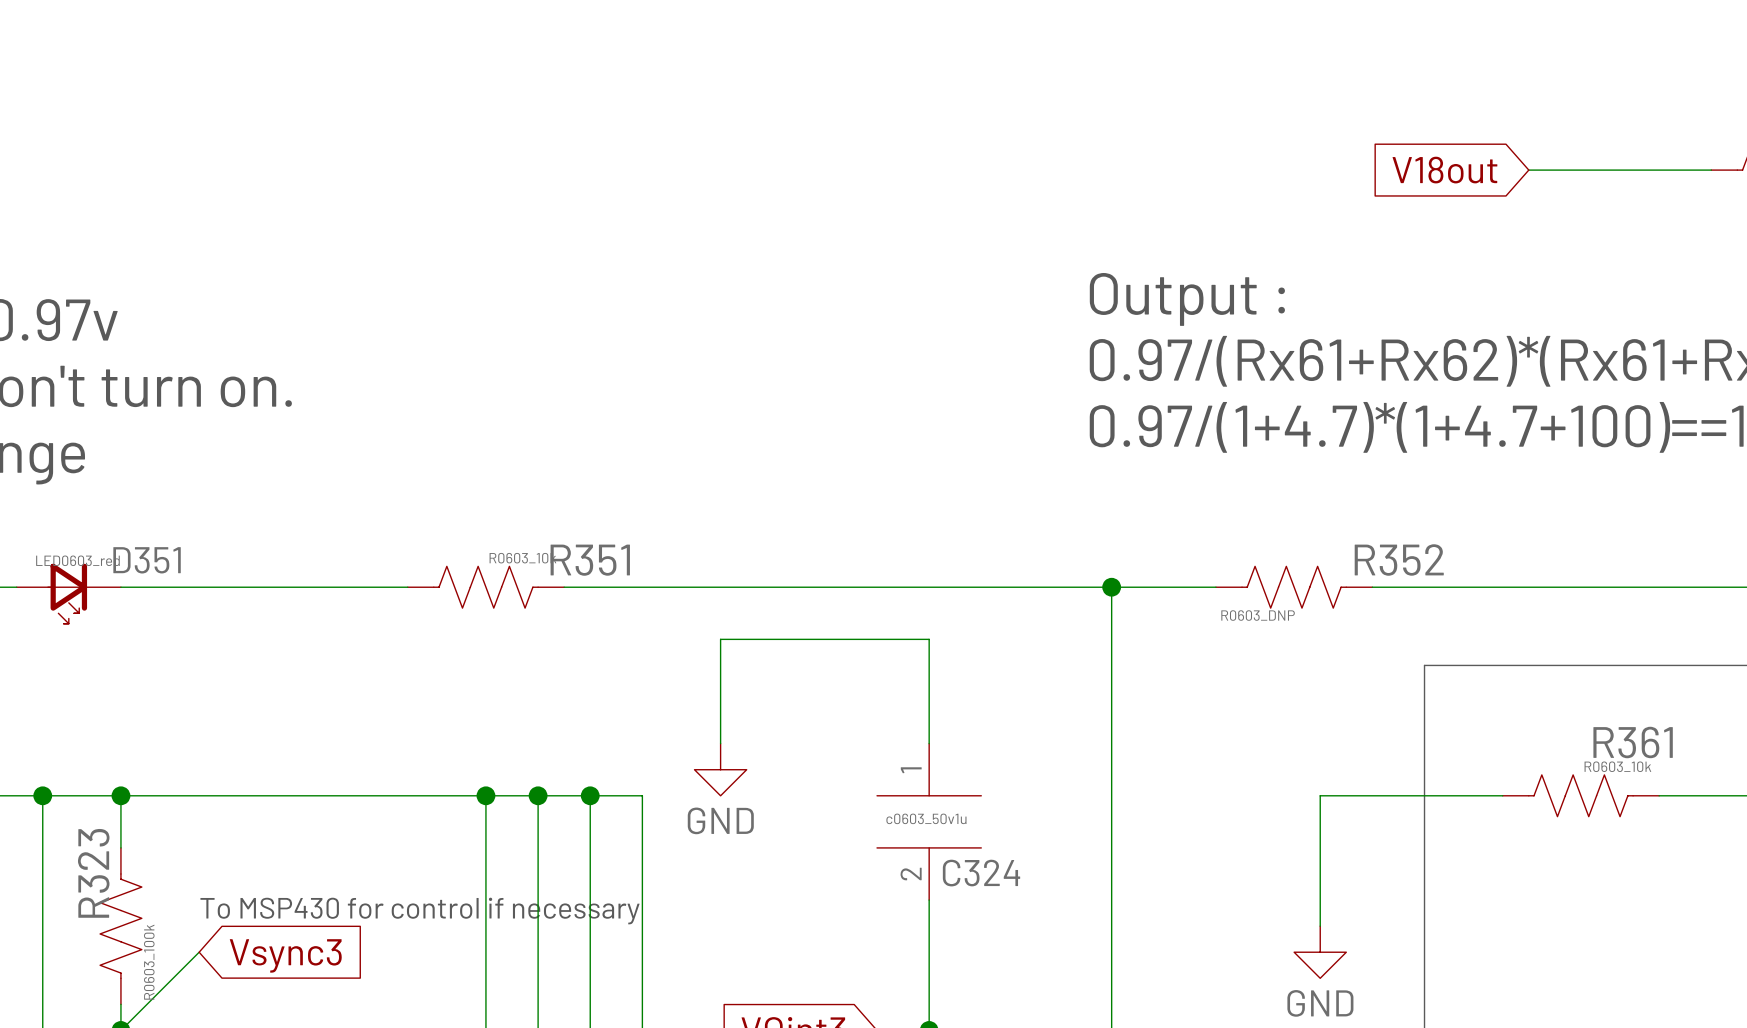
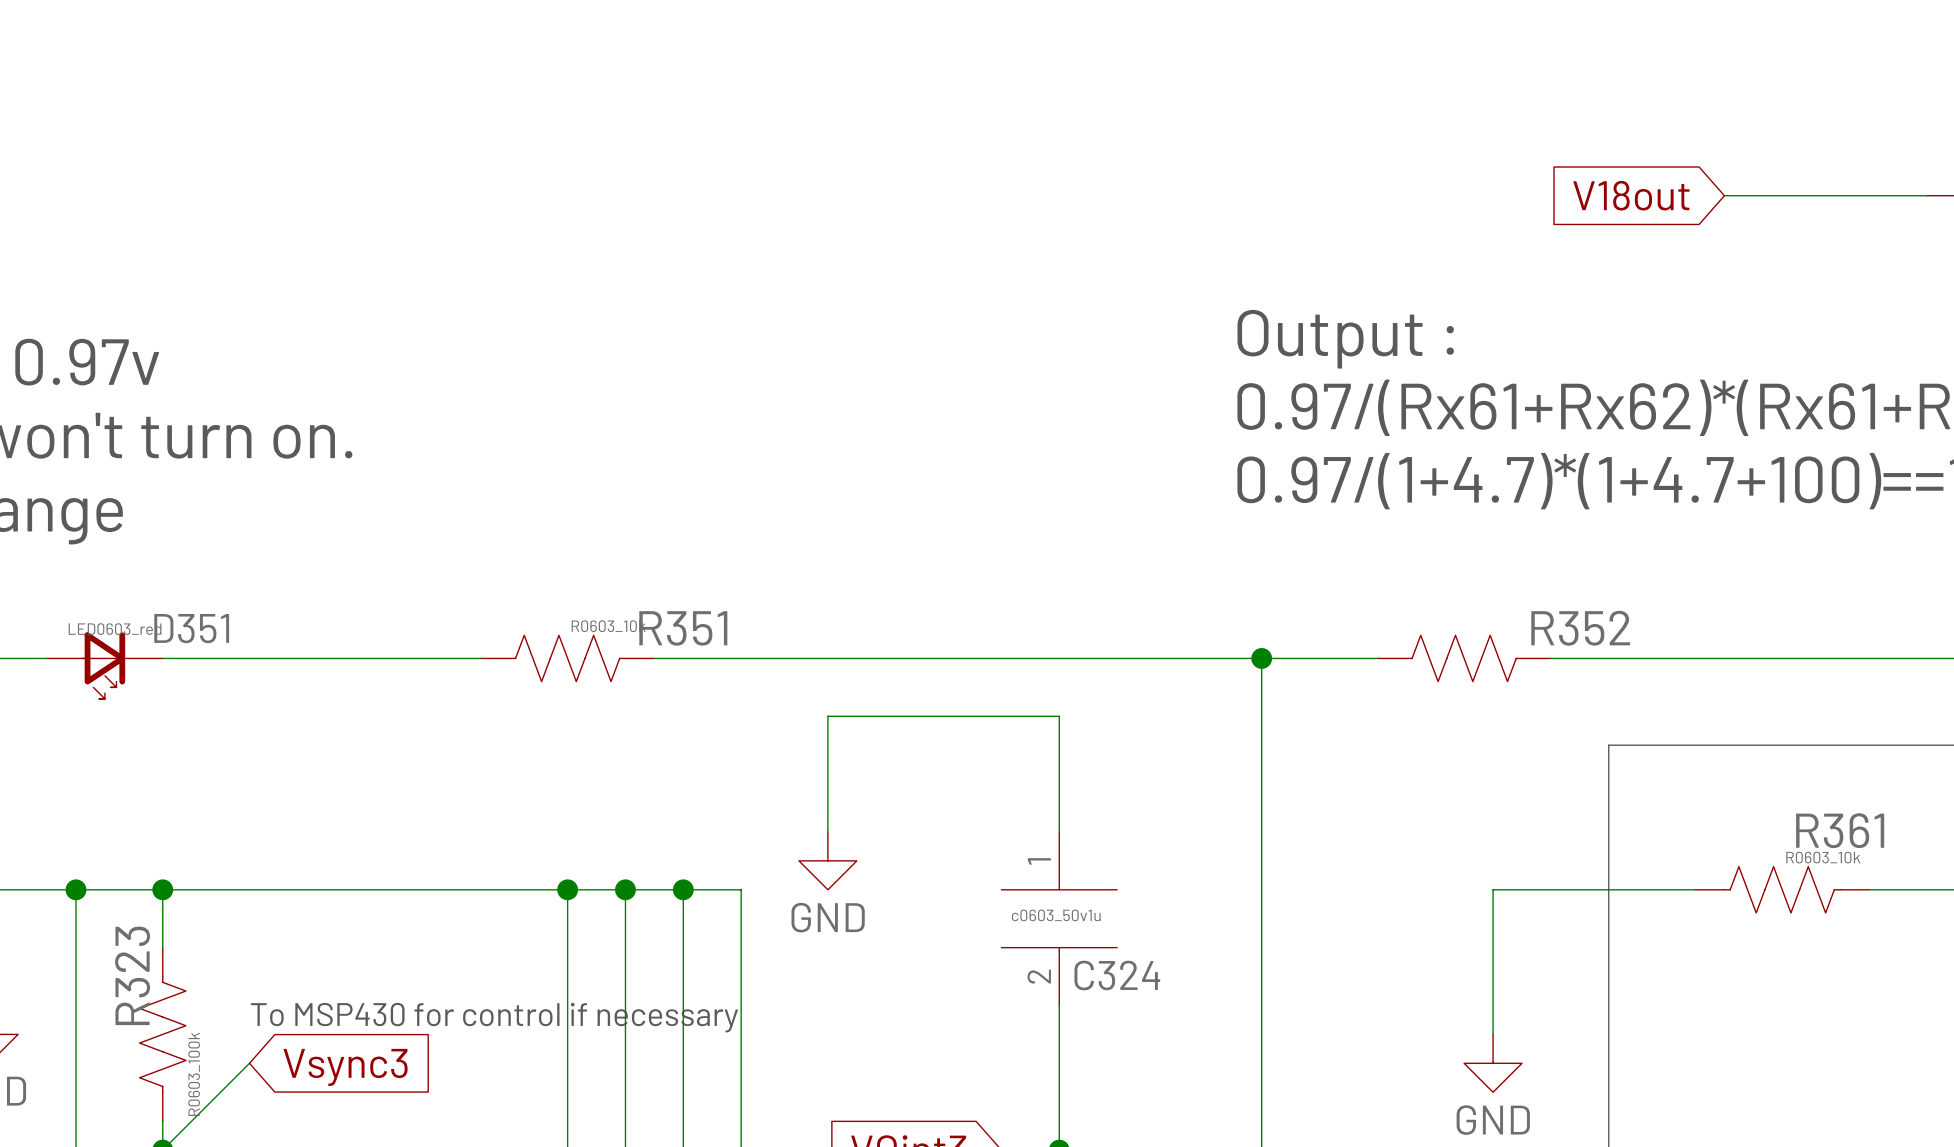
R352 value: R0603_DNP (1258, 615) -> none

